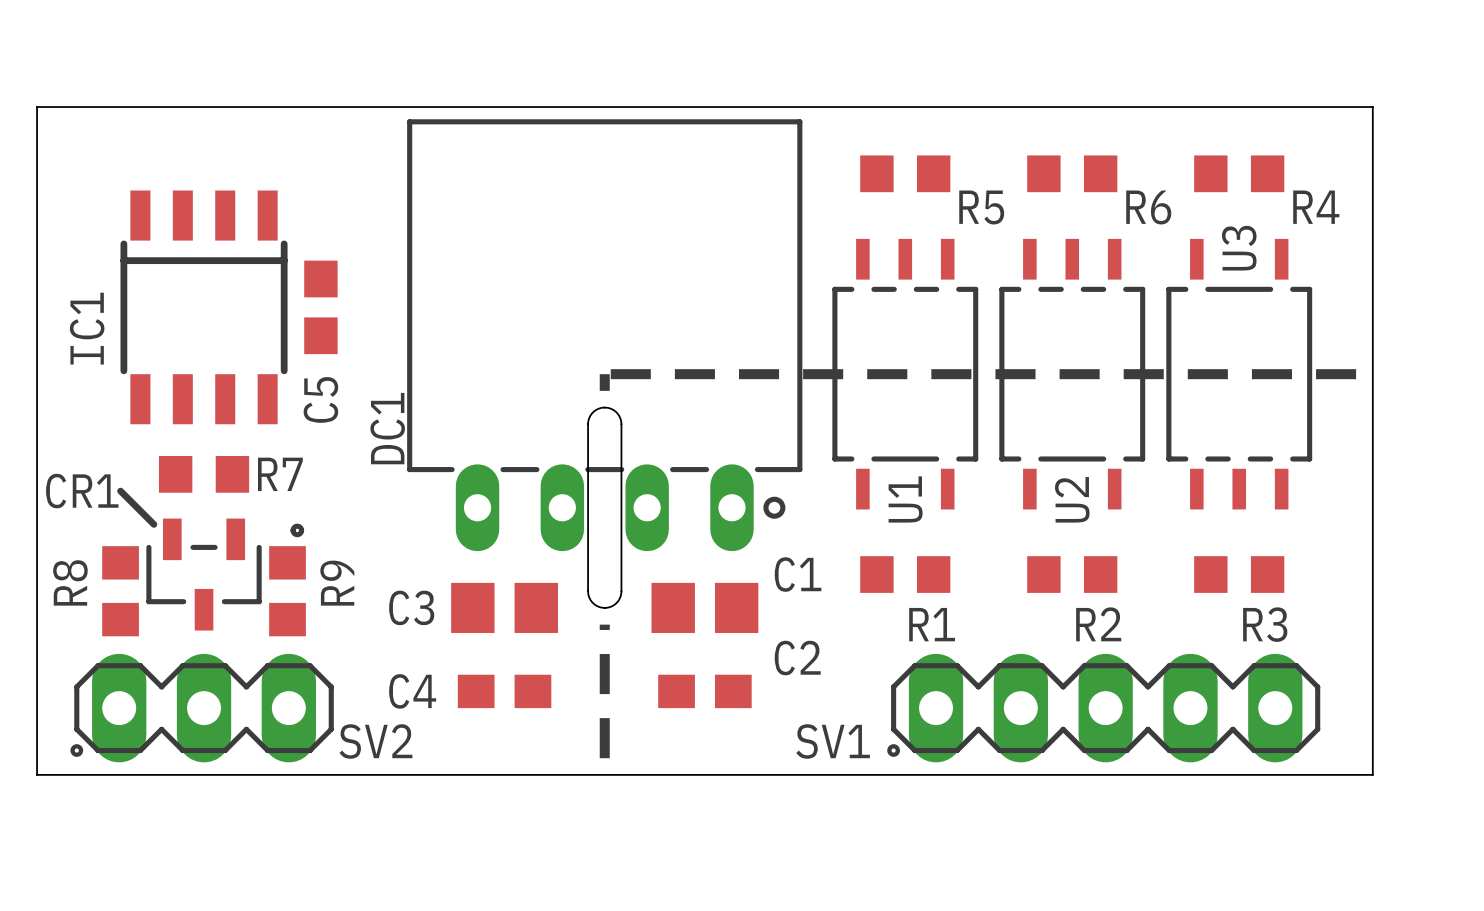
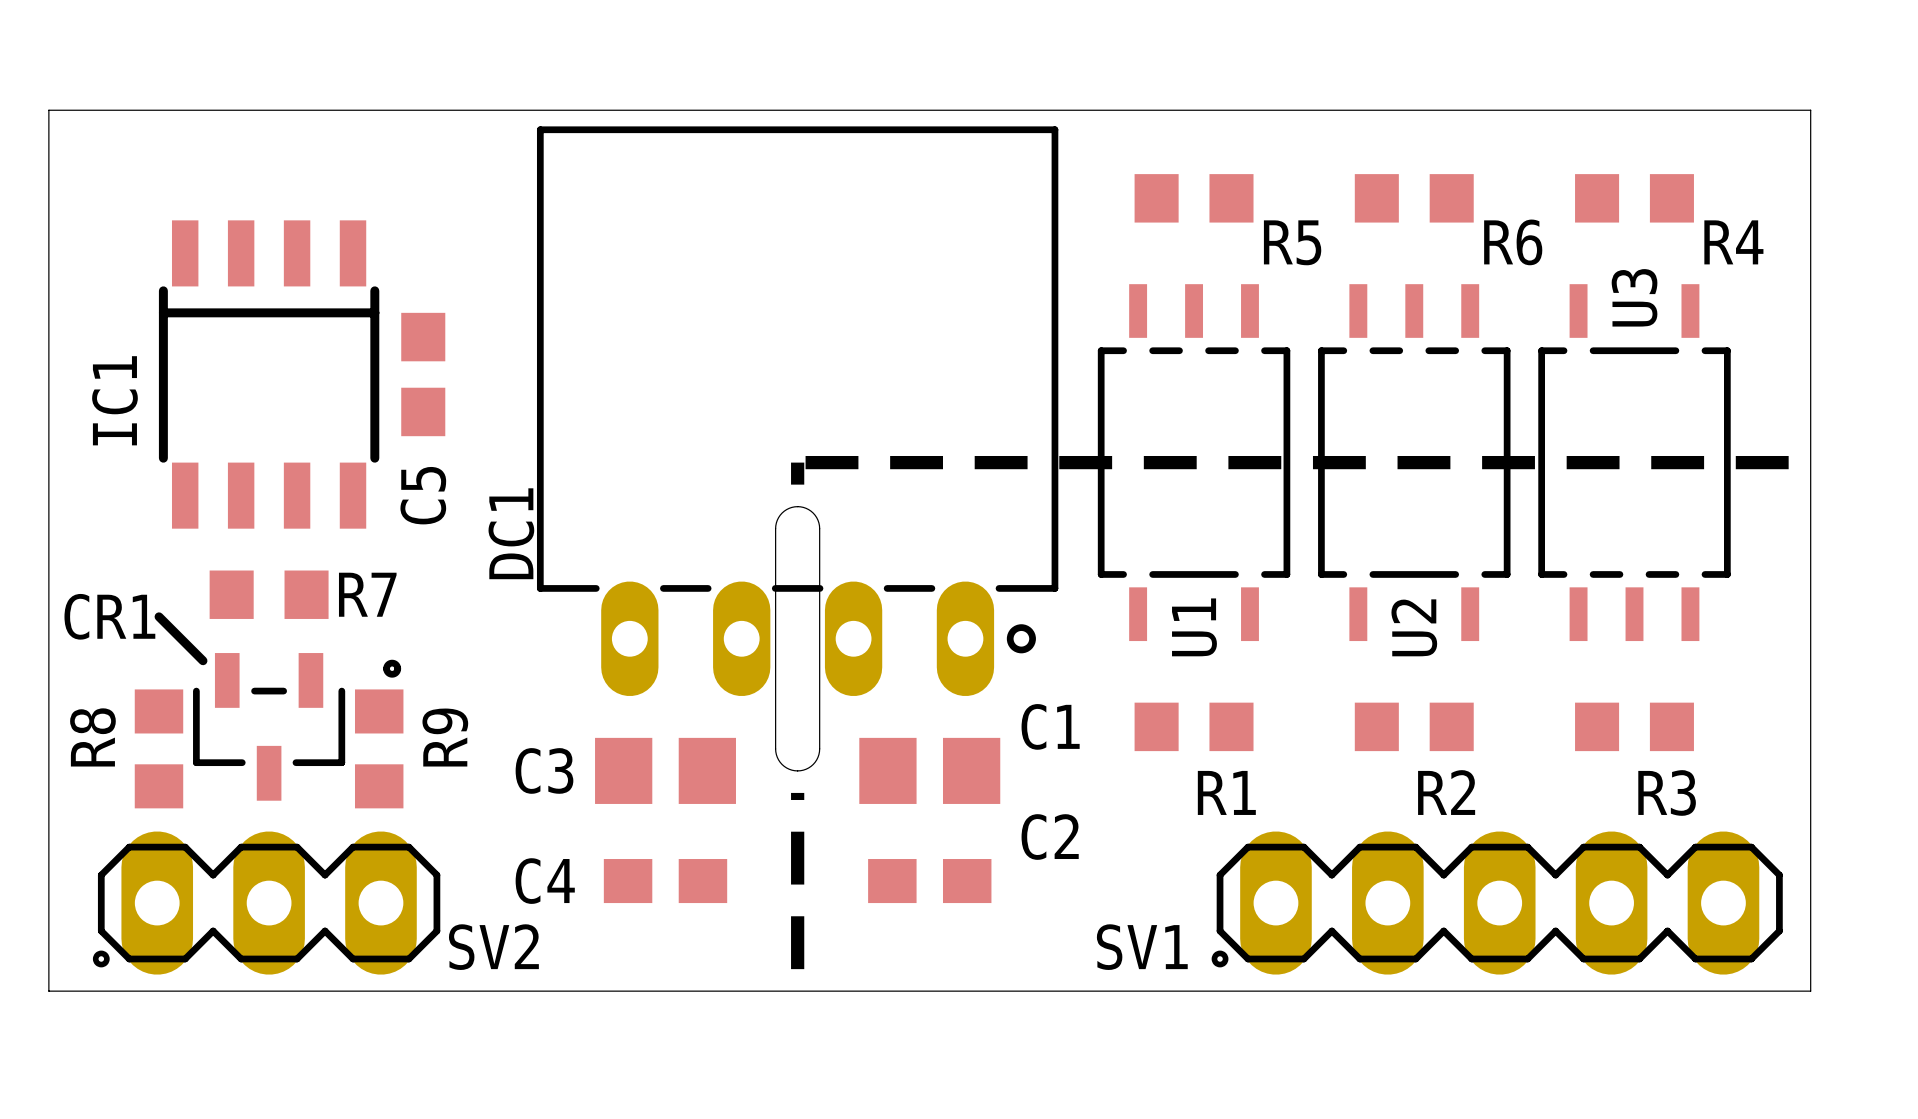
SV1 position: (1103, 708) -> (1497, 903)

